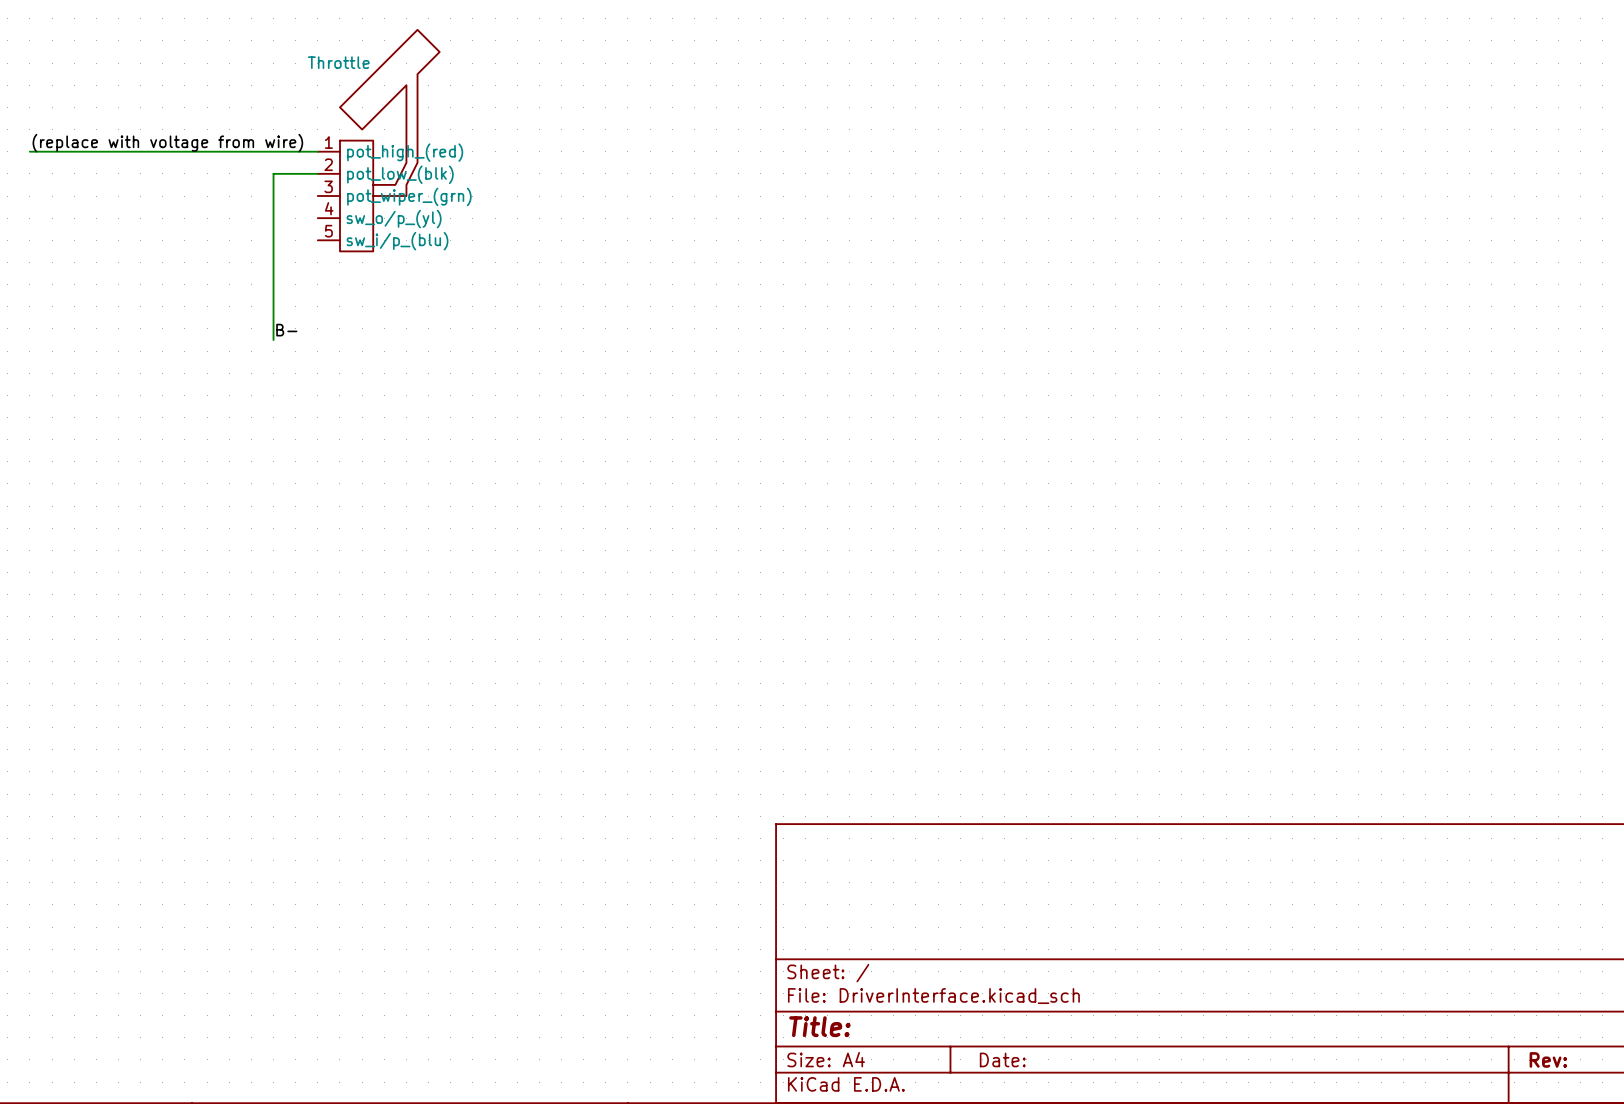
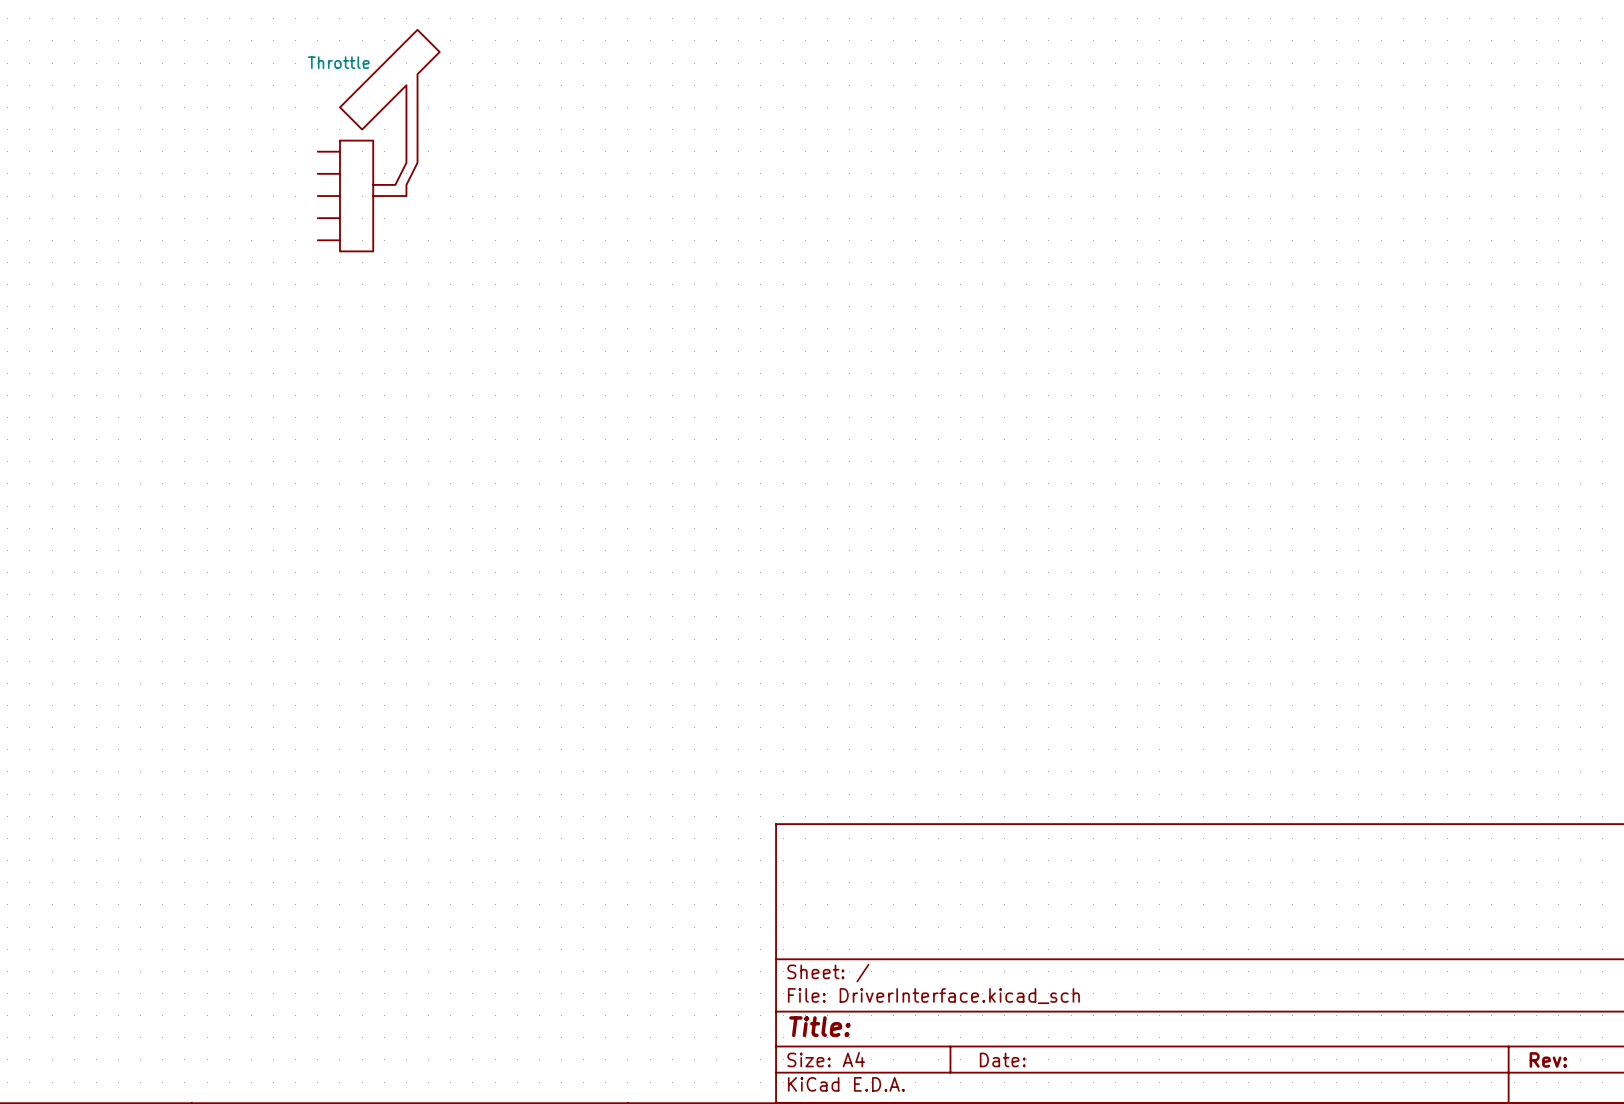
part symbol: [317, 29, 440, 252] -> [317, 29, 440, 252]
label: (replace with voltage from wire) (167, 143) -> none
wire: (29, 151) (317, 151) -> none
wire: (317, 173) (273, 173) (273, 339) -> none
label: B- (286, 330) -> none

